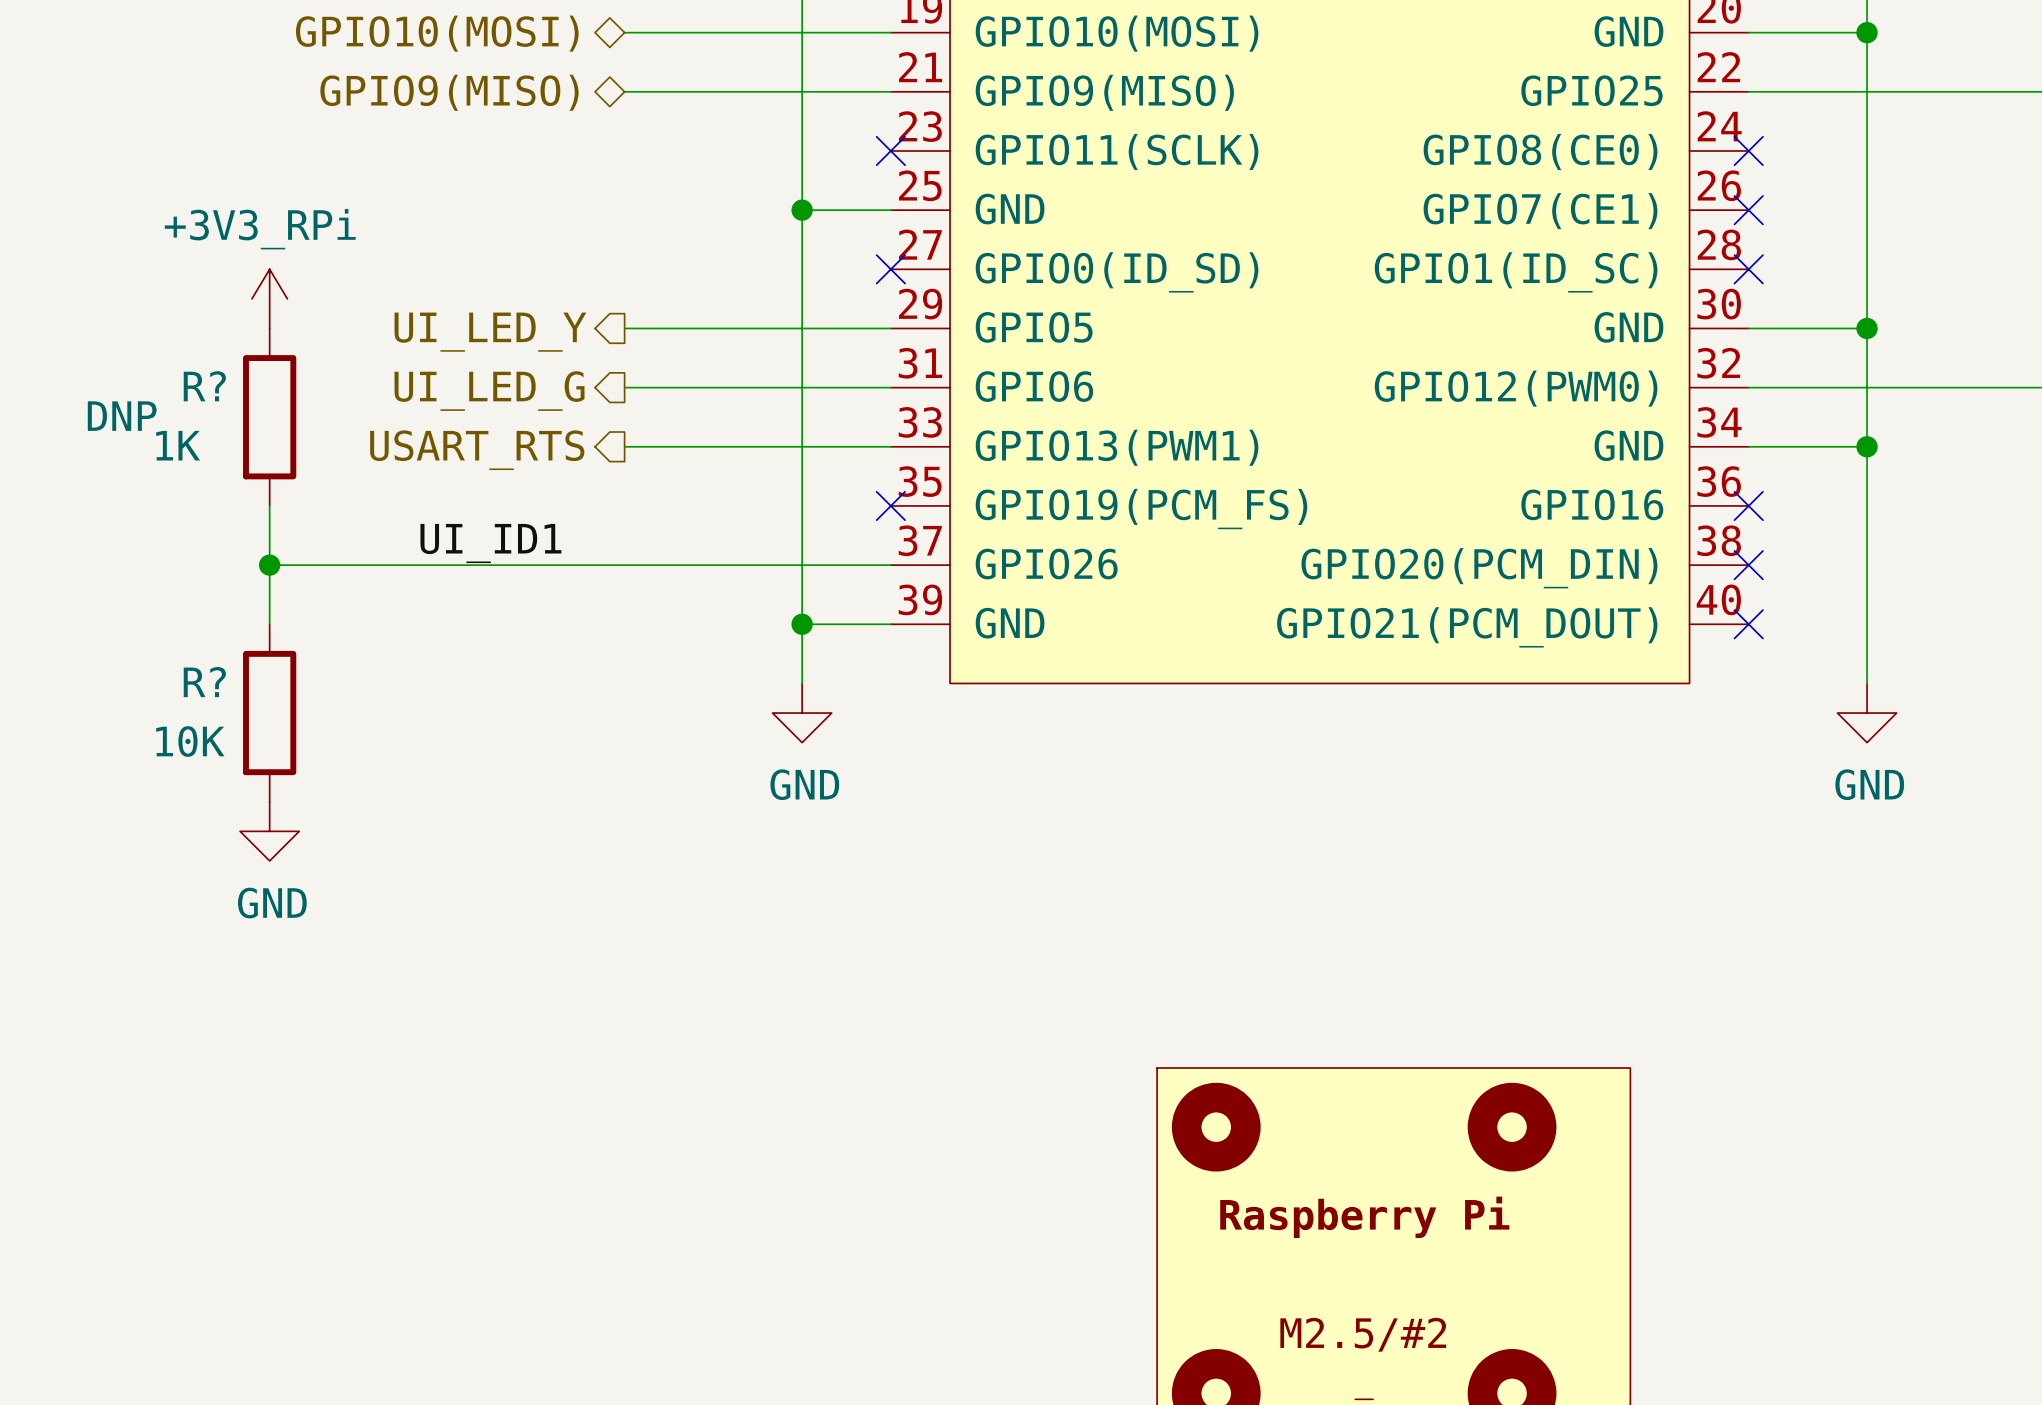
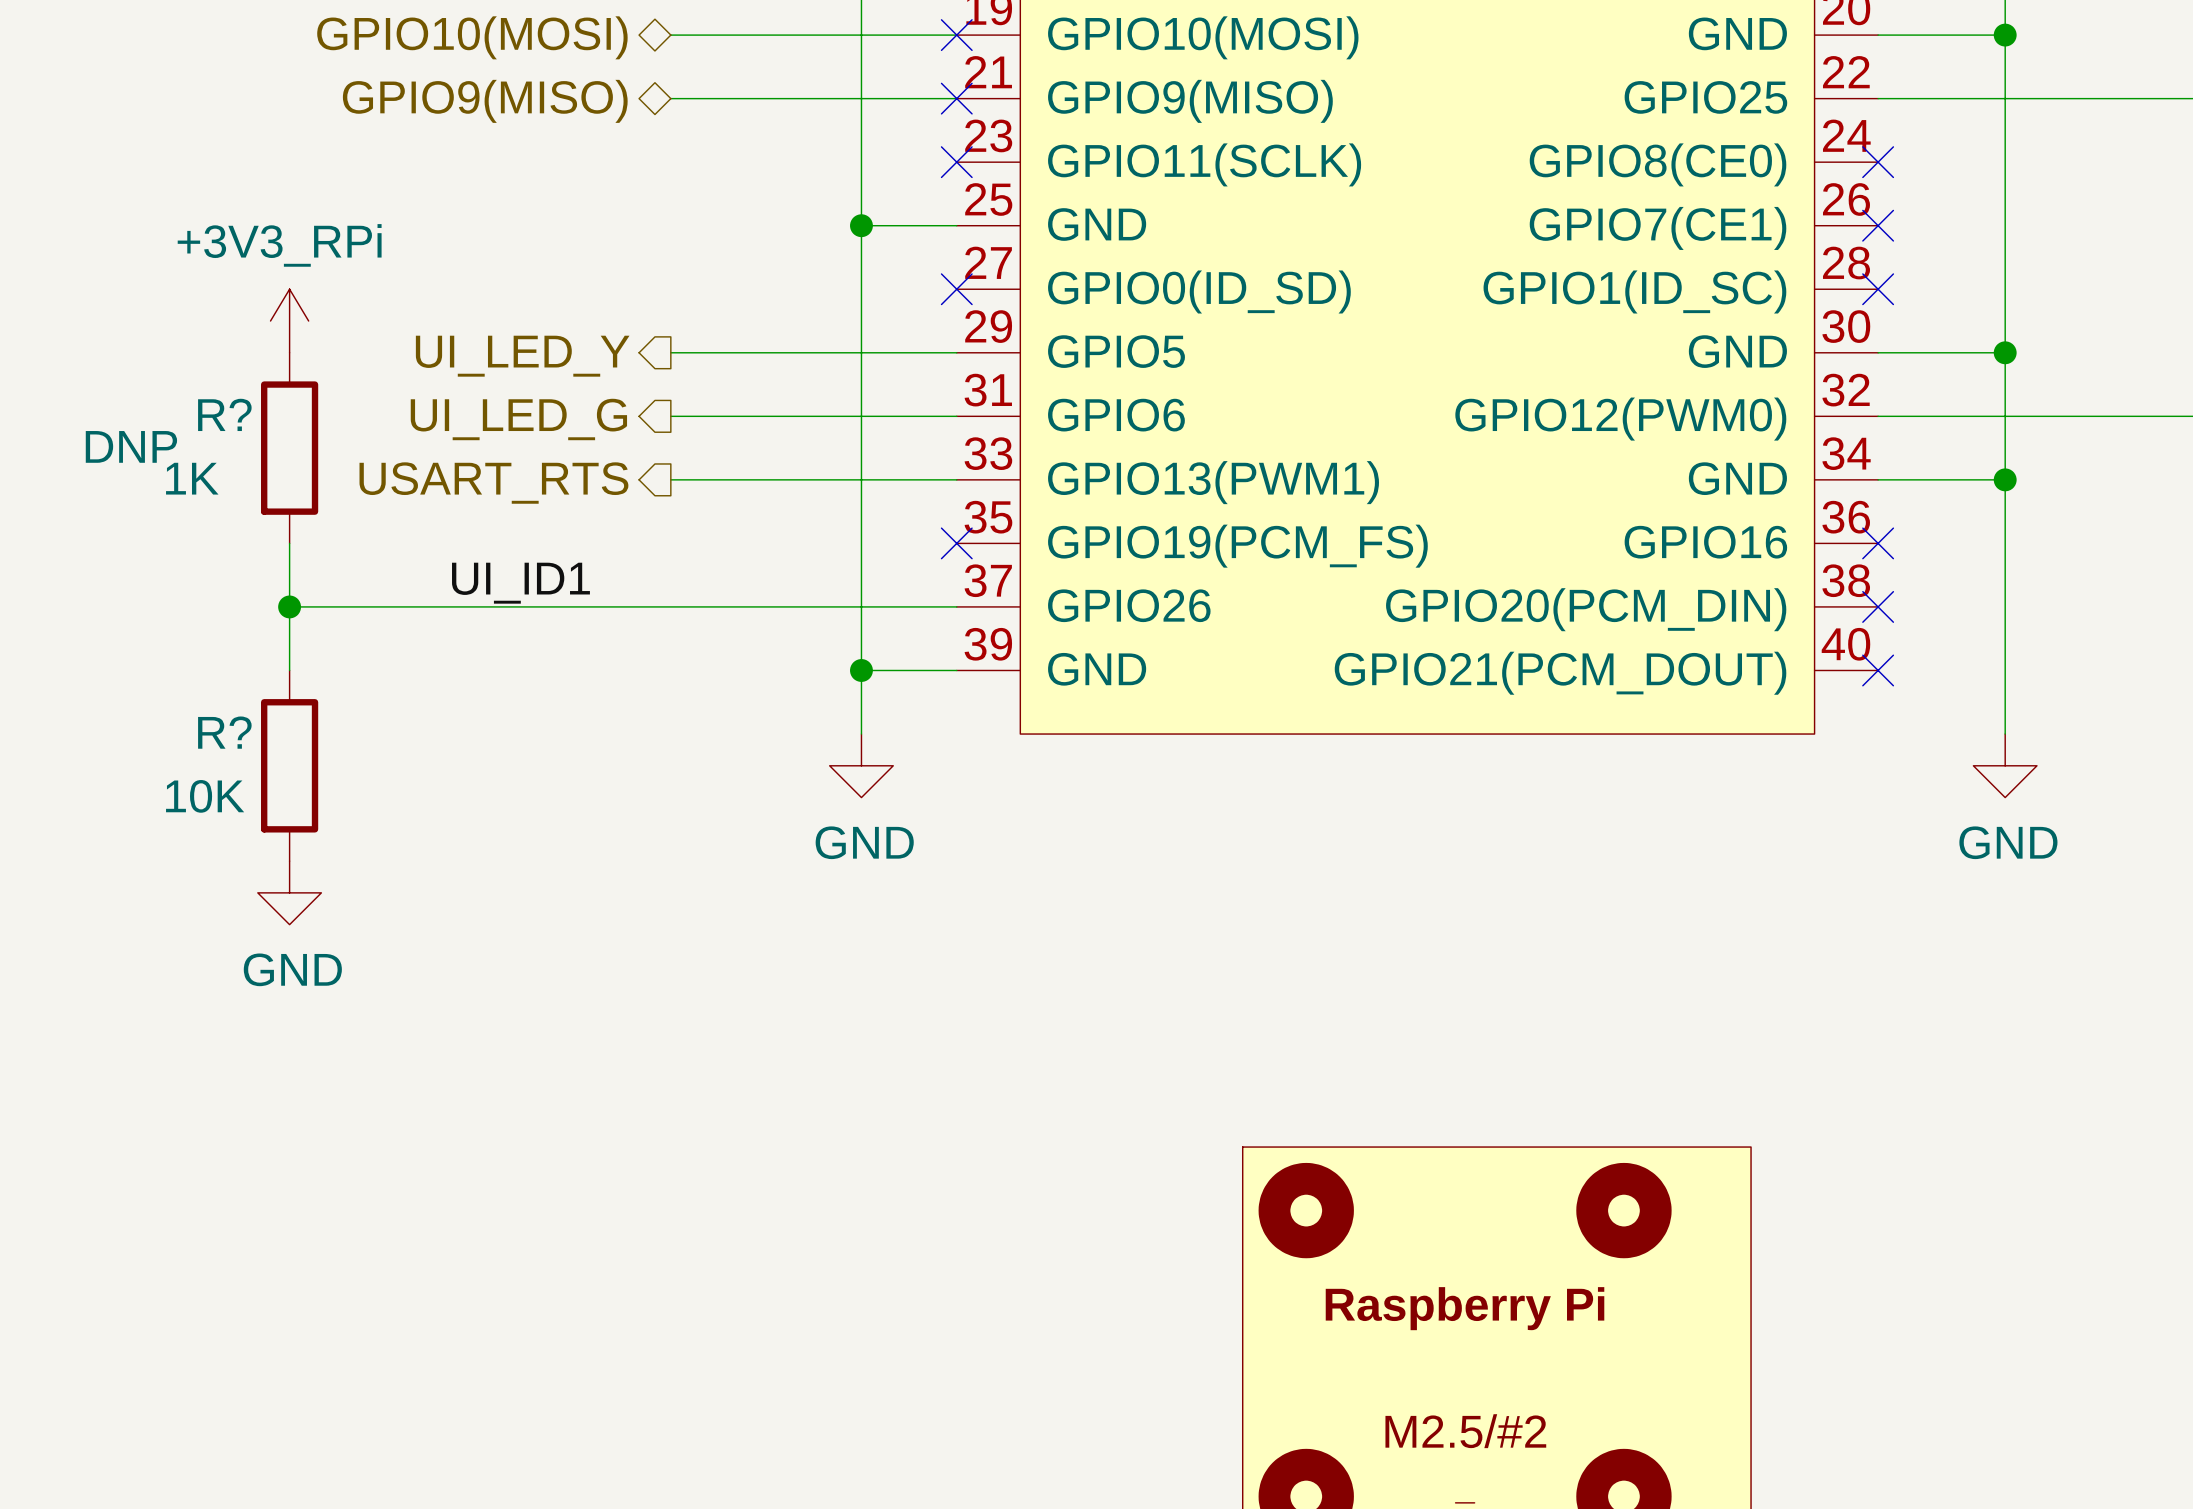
no-connect mark: none -> (956, 35)
no-connect mark: none -> (956, 98)

